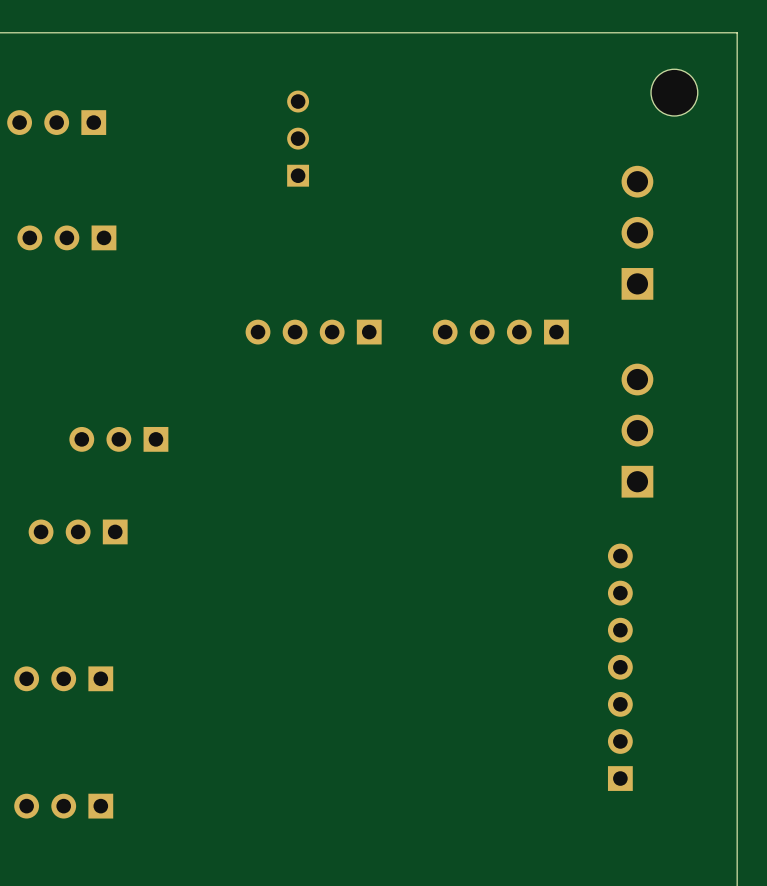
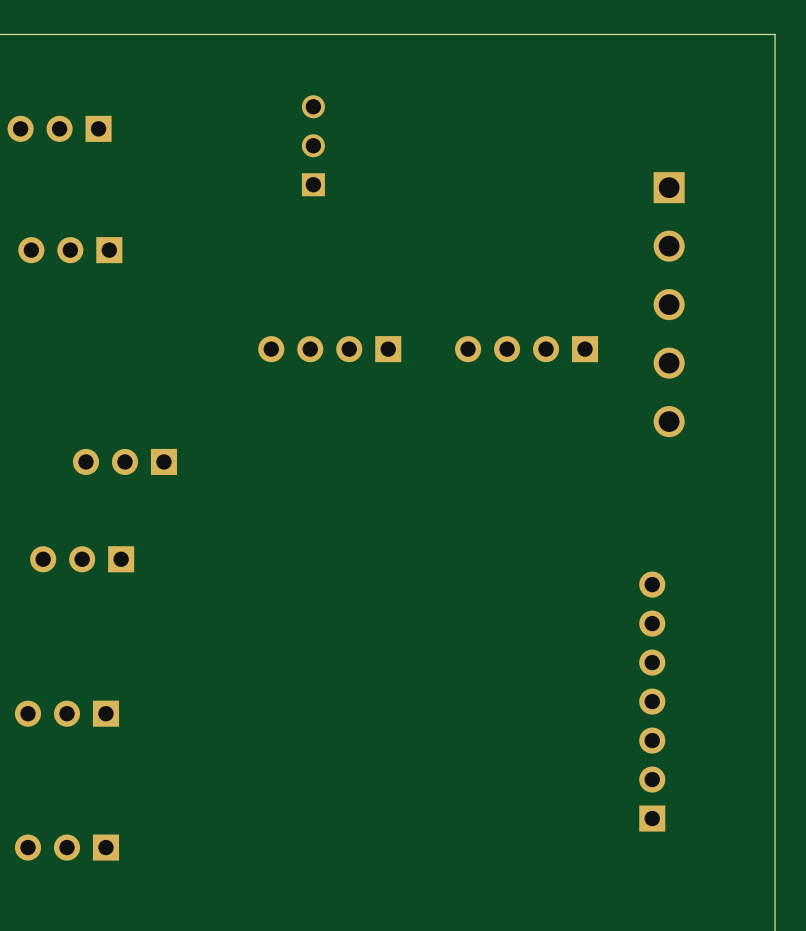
part: (674, 92) -> none
part: (637, 232) -> none
part: none -> (669, 304)
part: (637, 430) -> none

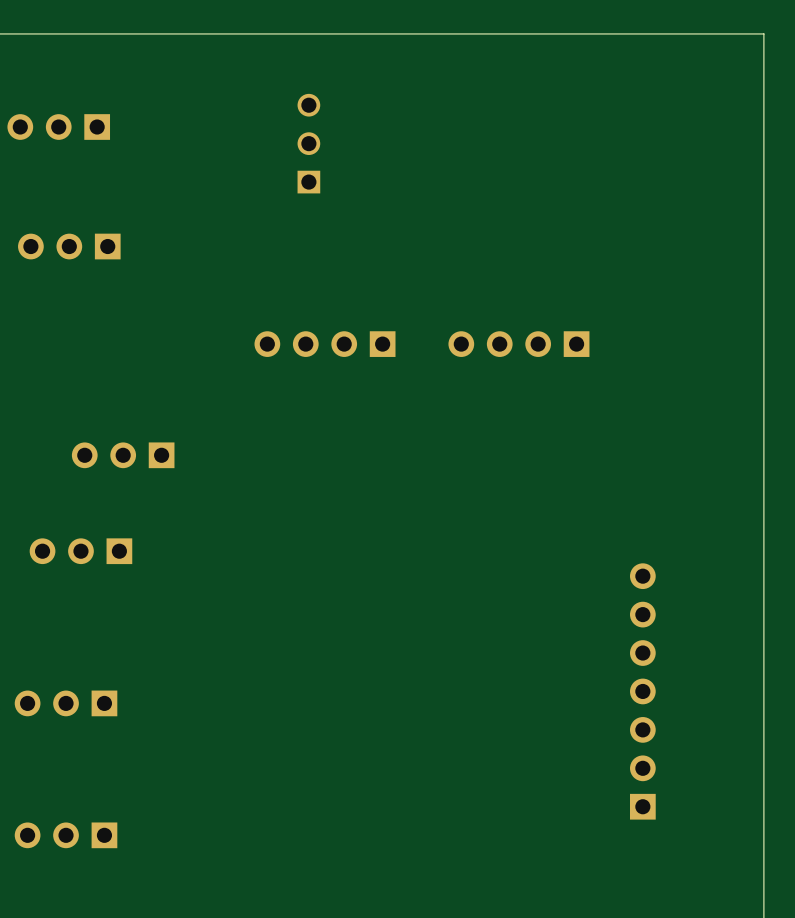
part: (669, 304) -> none

